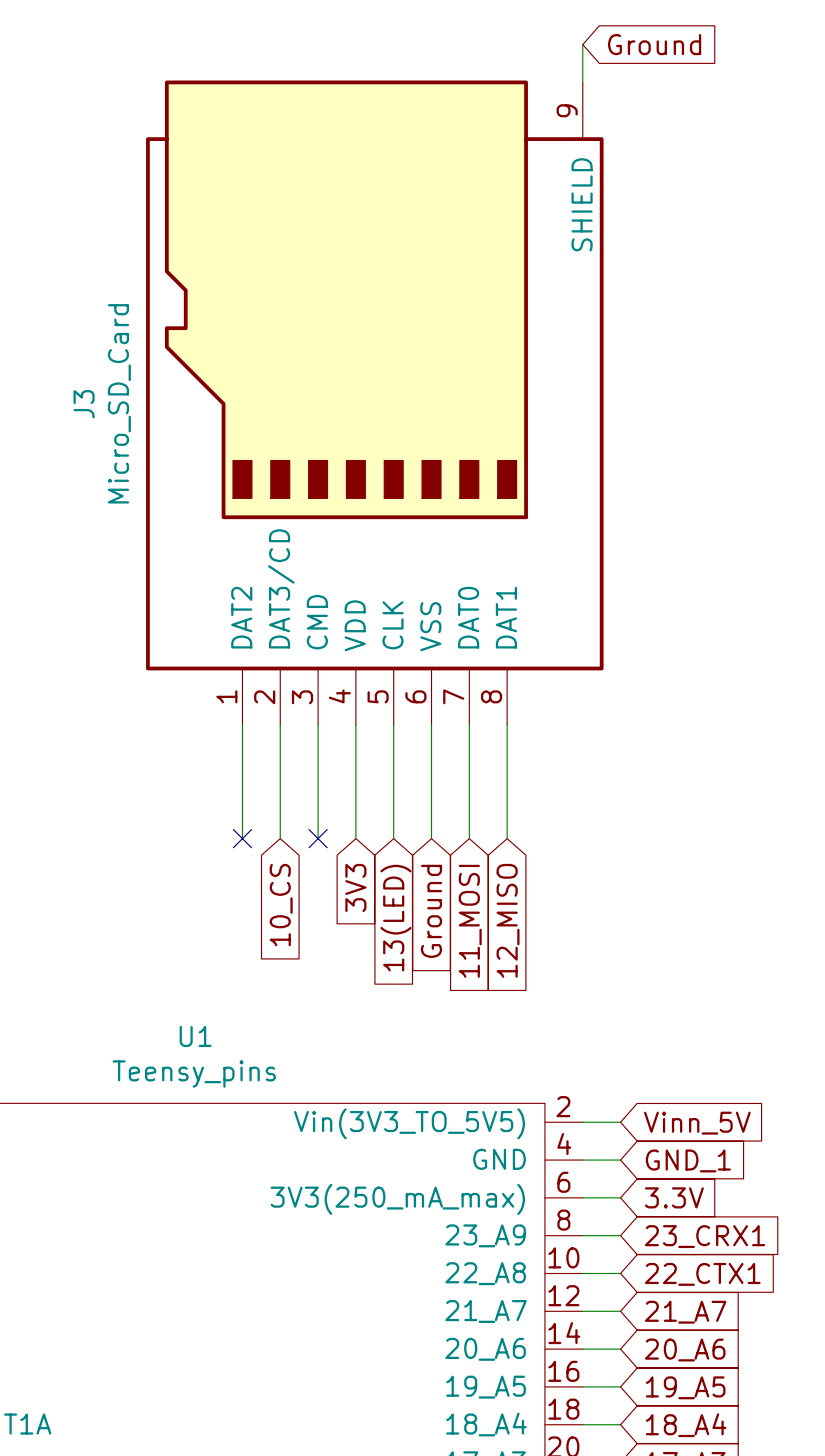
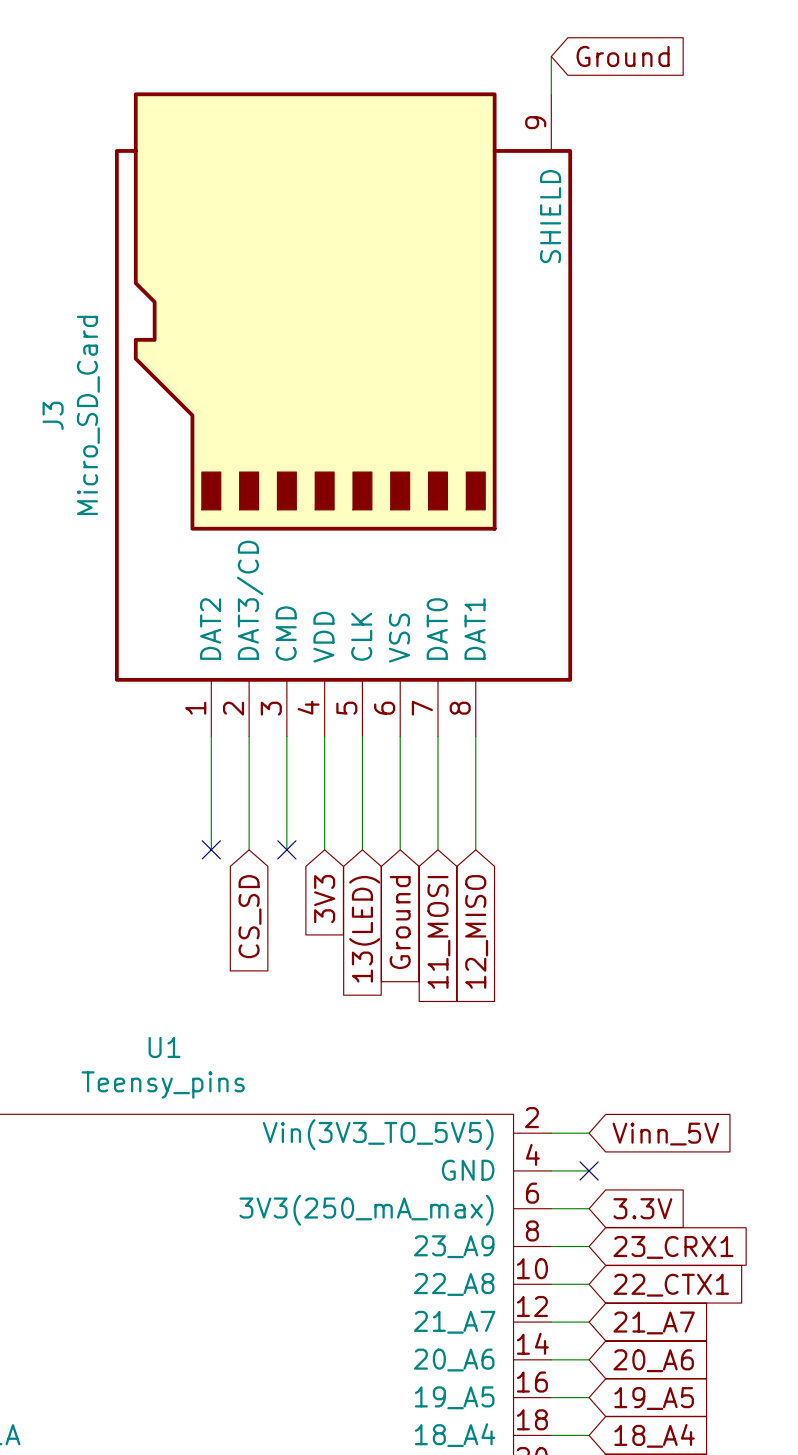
global label: 10_CS (281, 905) -> CS_SD (249, 916)
no-connect mark: none -> (589, 1170)
global label: GND_1 (688, 1160) -> none

